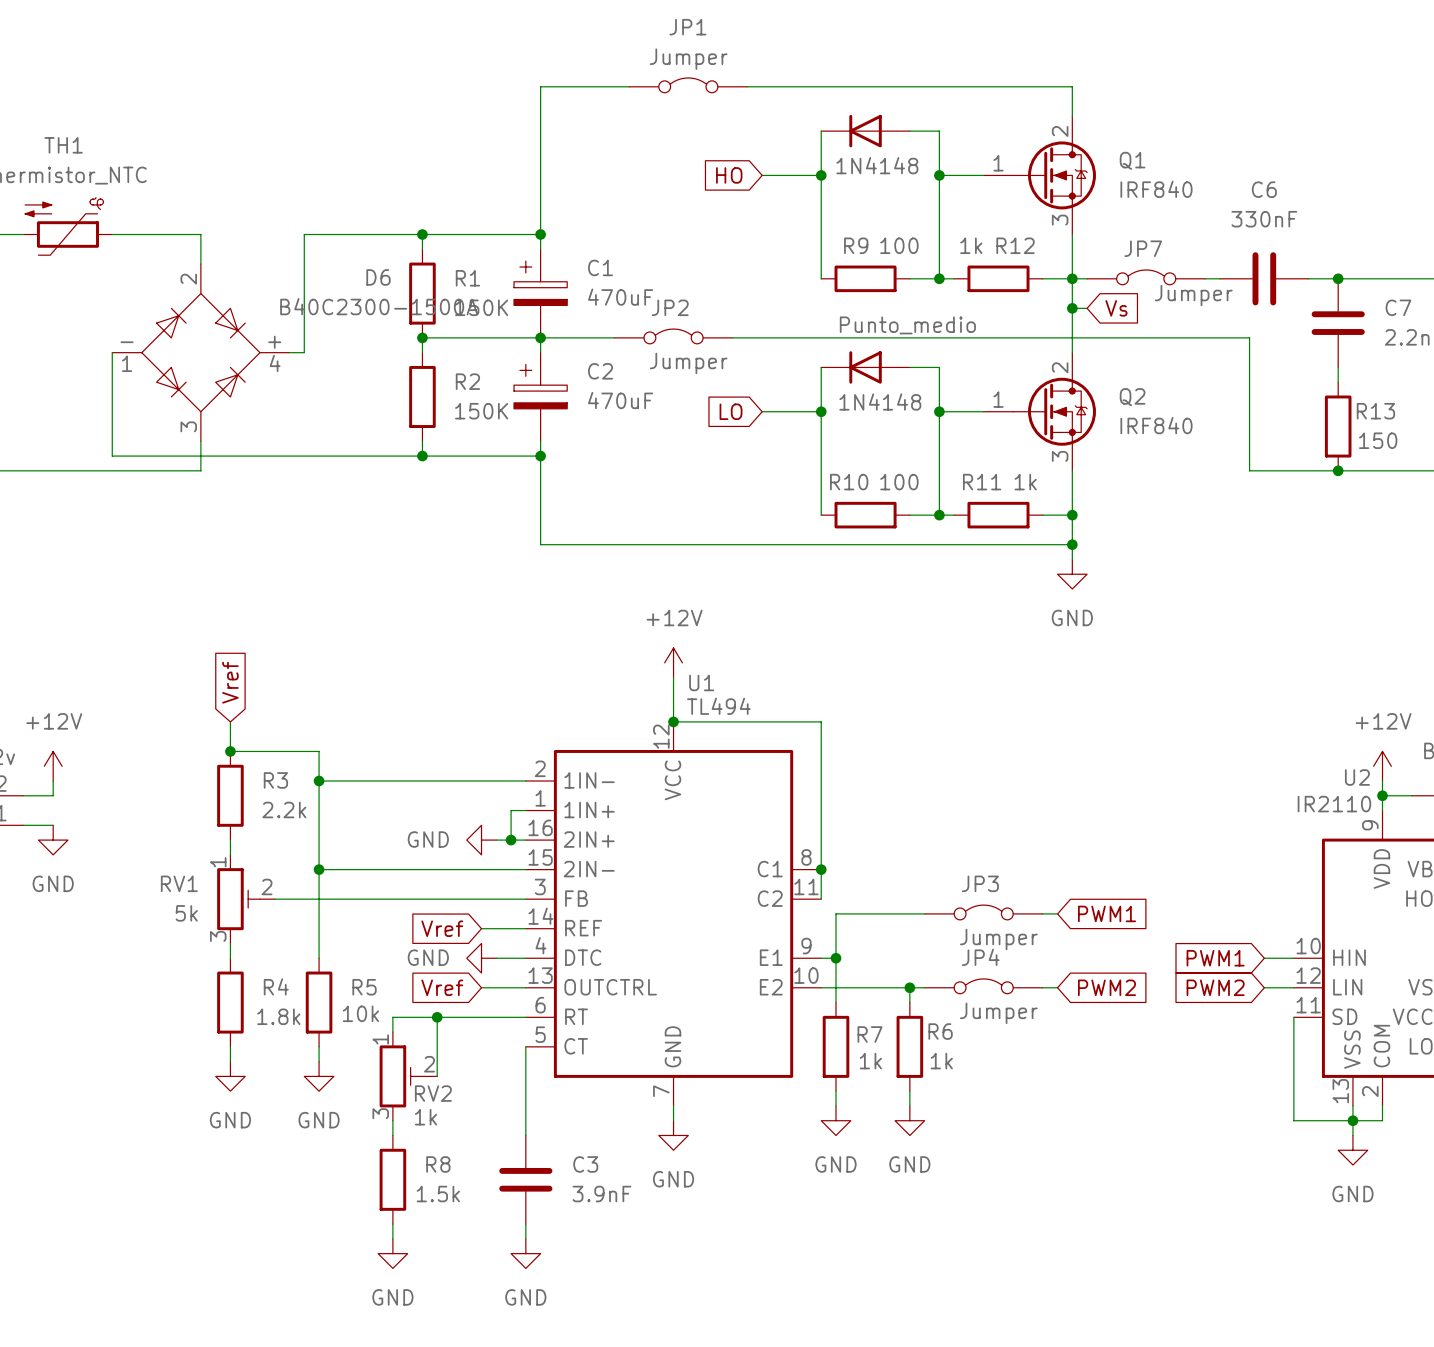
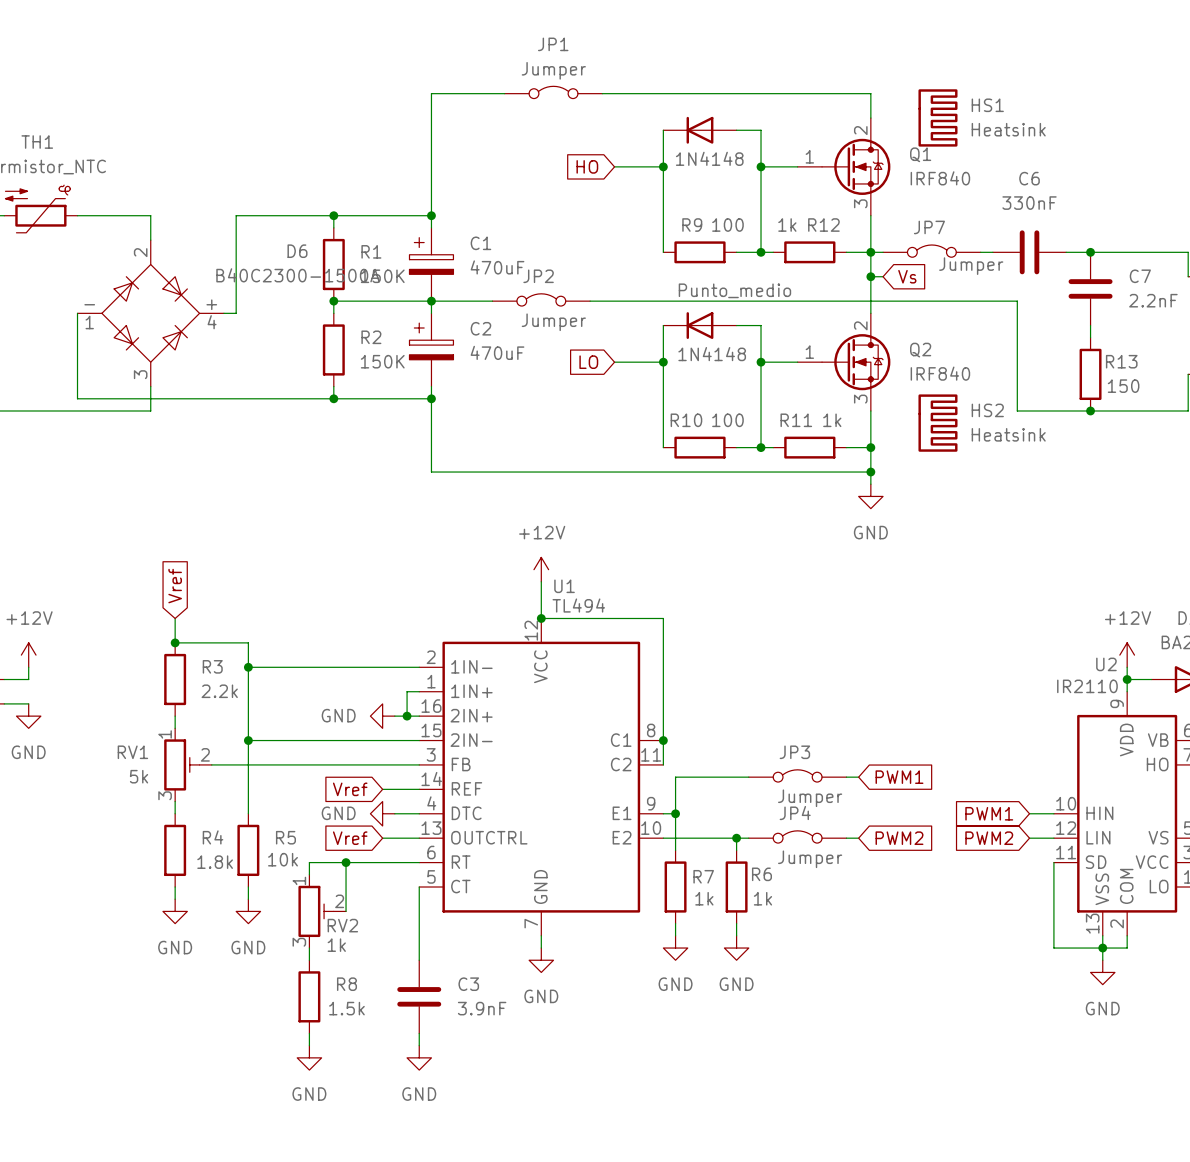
HS1: none -> Heatsink (937, 117)
HS2: none -> Heatsink (937, 423)

